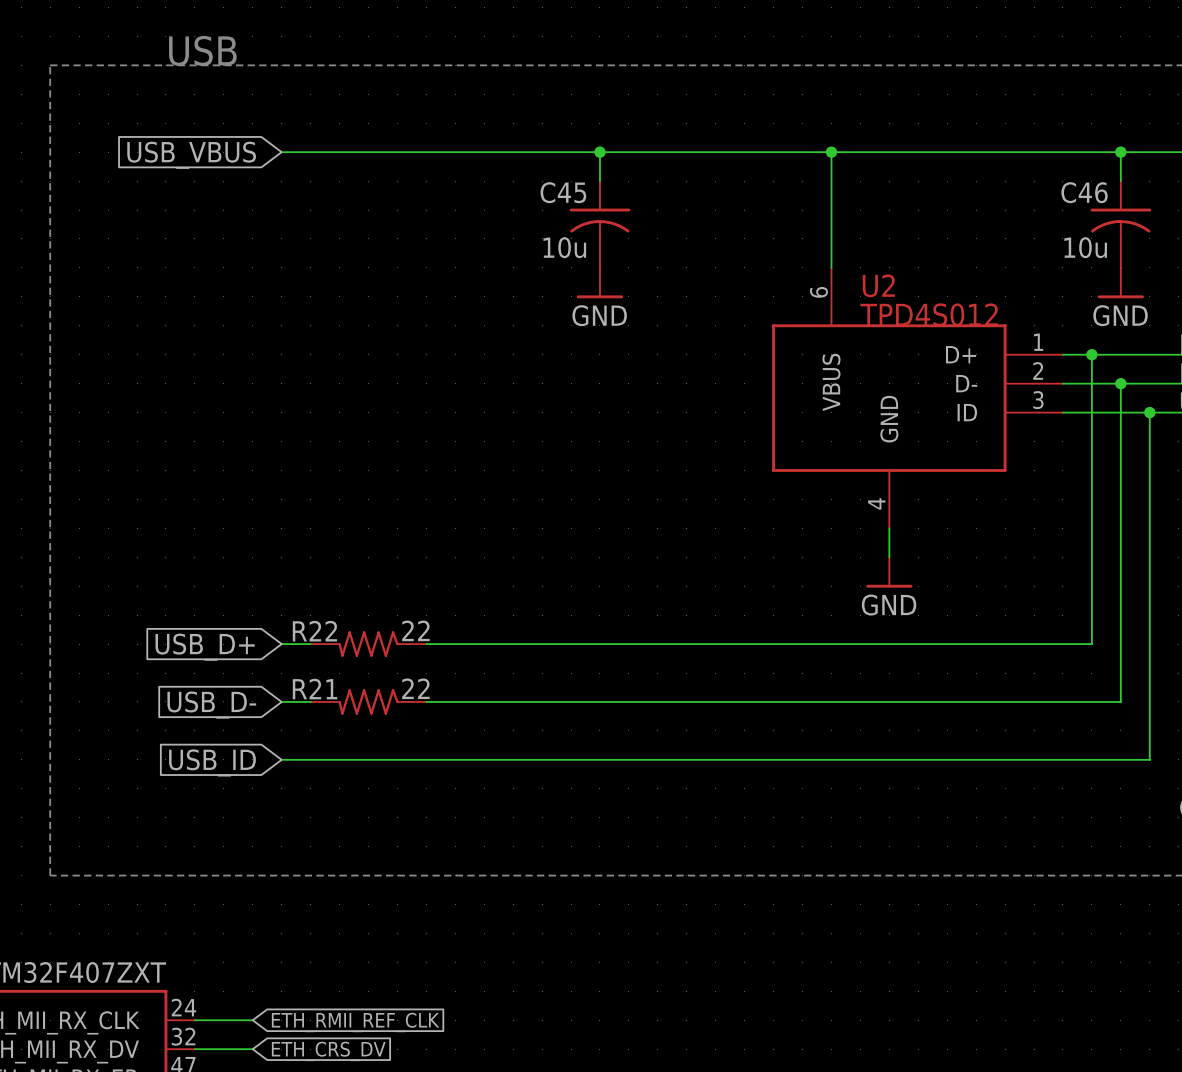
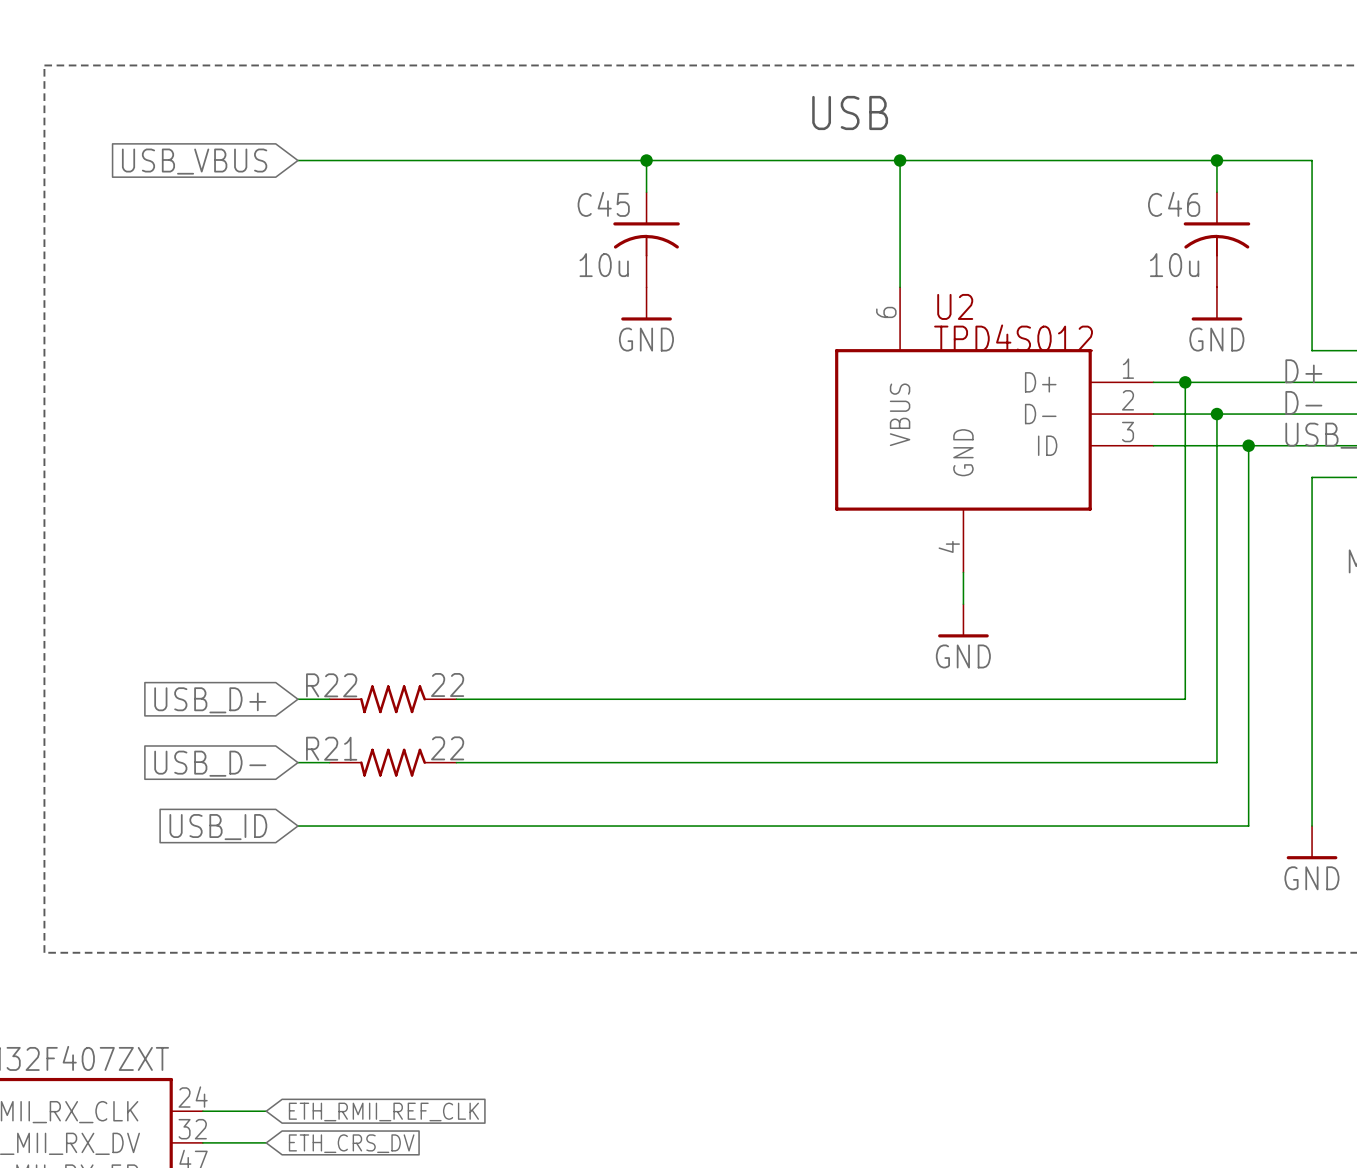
text: USB (202, 50) -> none
text: none -> USB (850, 112)

